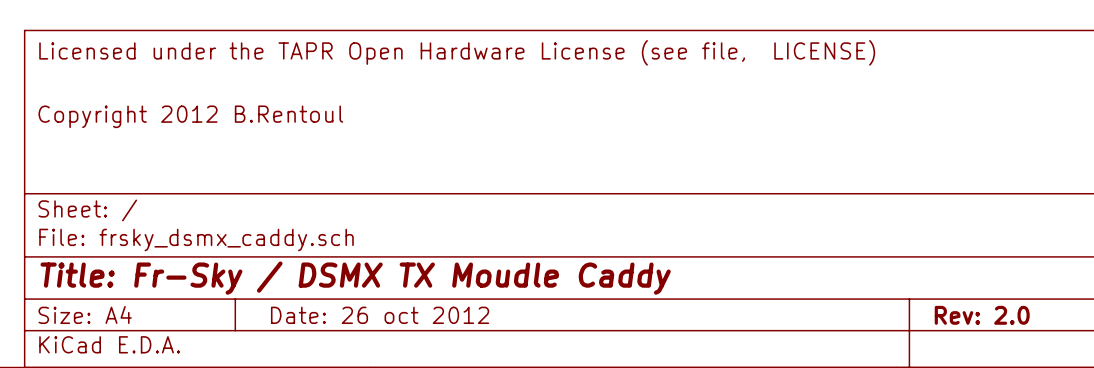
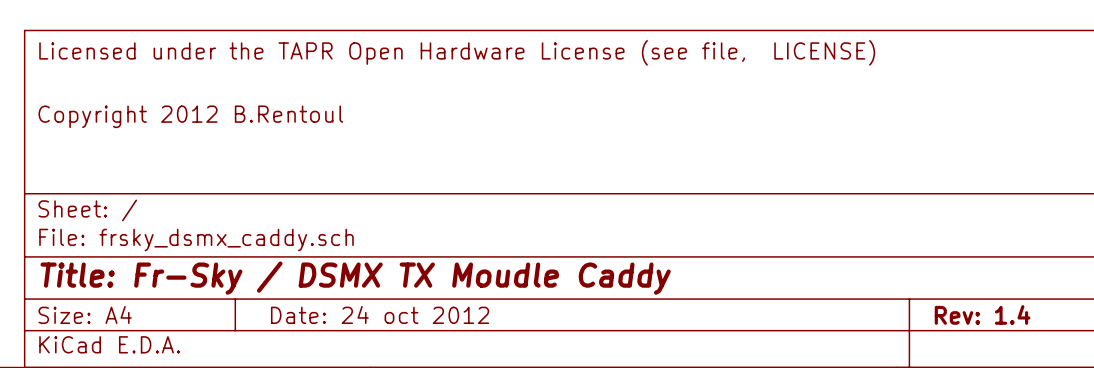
title block: Date: 26 oct 2012 (380, 315) -> Date: 24 oct 2012 (380, 314)
title block: Rev: 2.0 (982, 315) -> Rev: 1.4 (982, 314)

